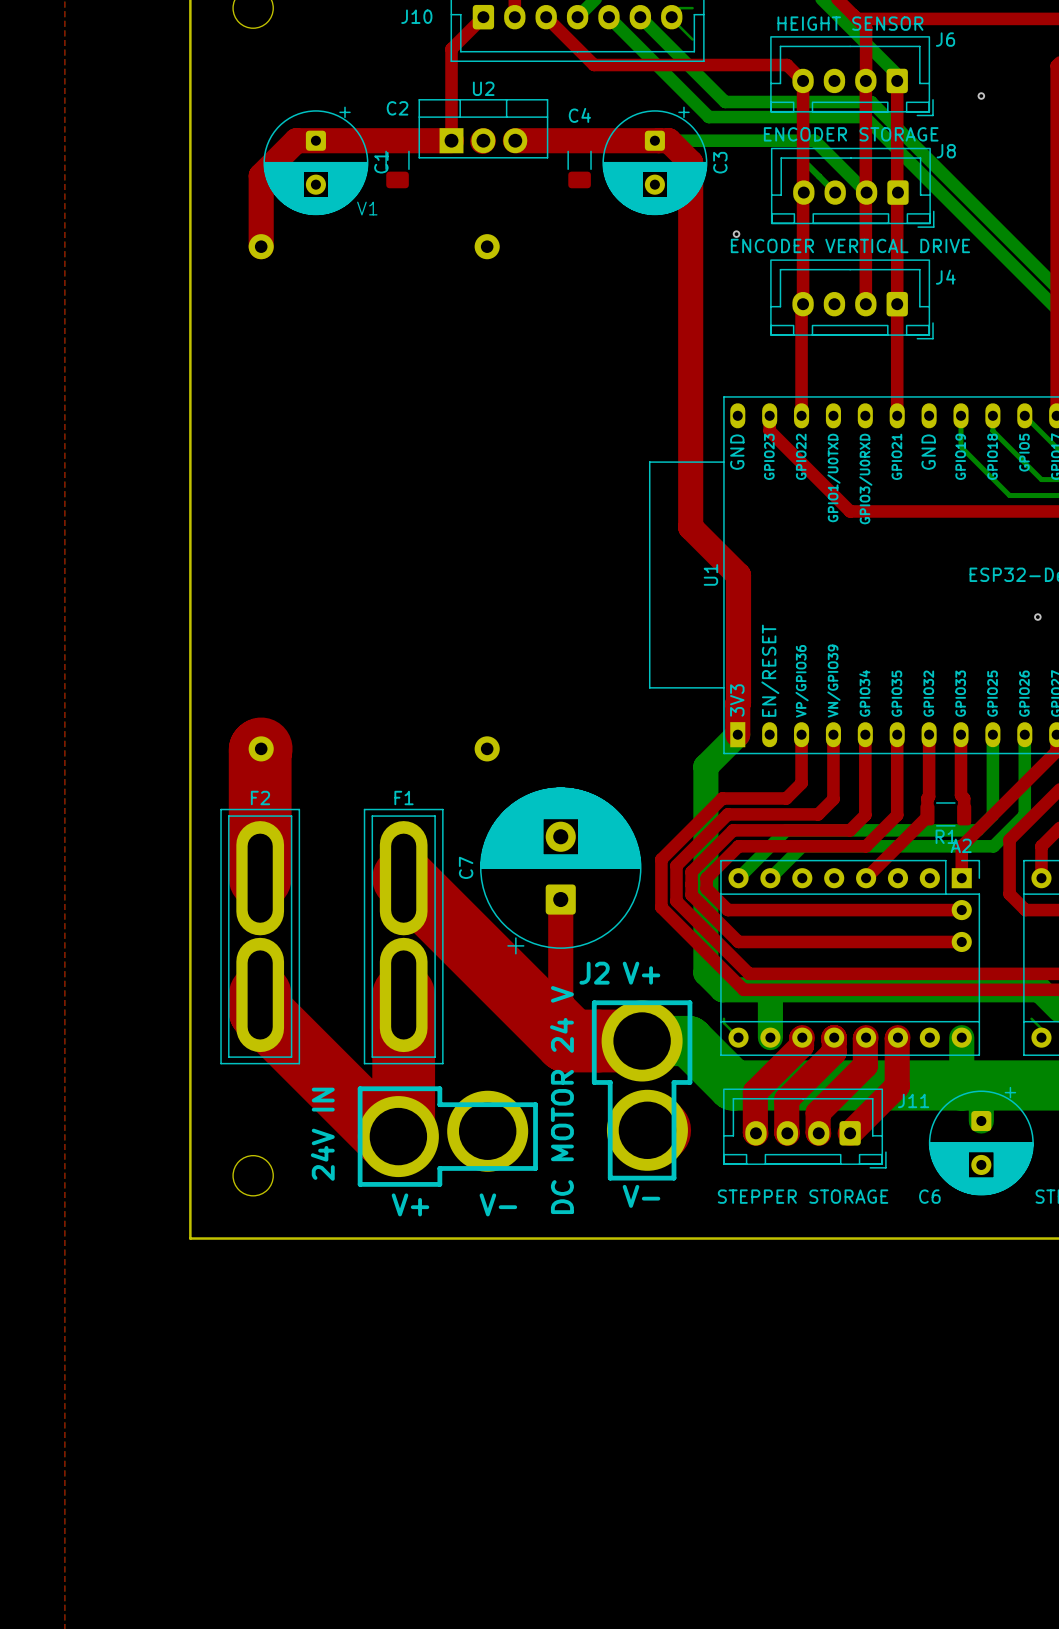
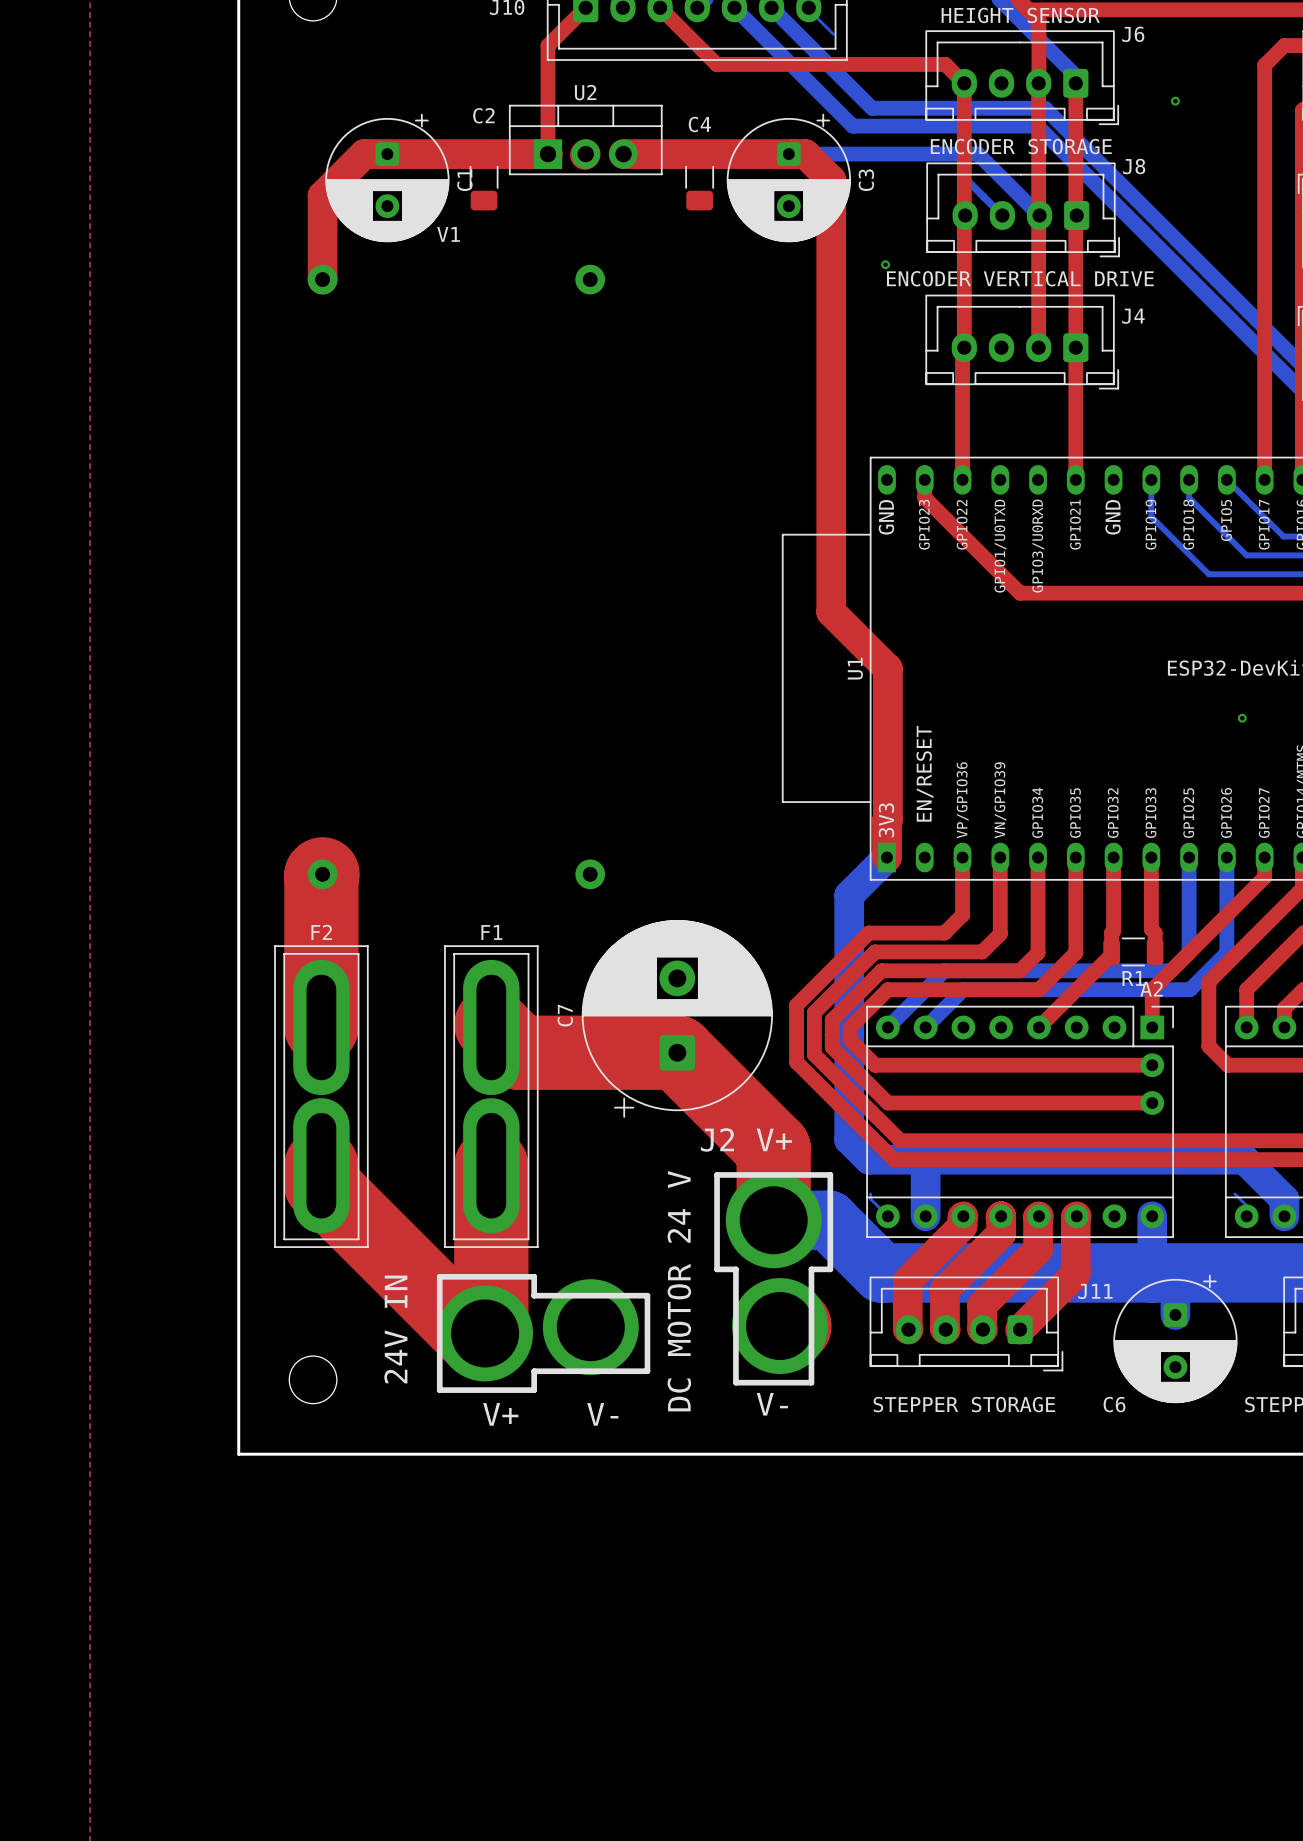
top track: (403, 878) (566, 1041) (642, 1041) -> (491, 1024) (519, 1052) (677, 1052) (773, 1149) (773, 1220)
top track: (560, 899) (560, 1003) (598, 1041) -> none

